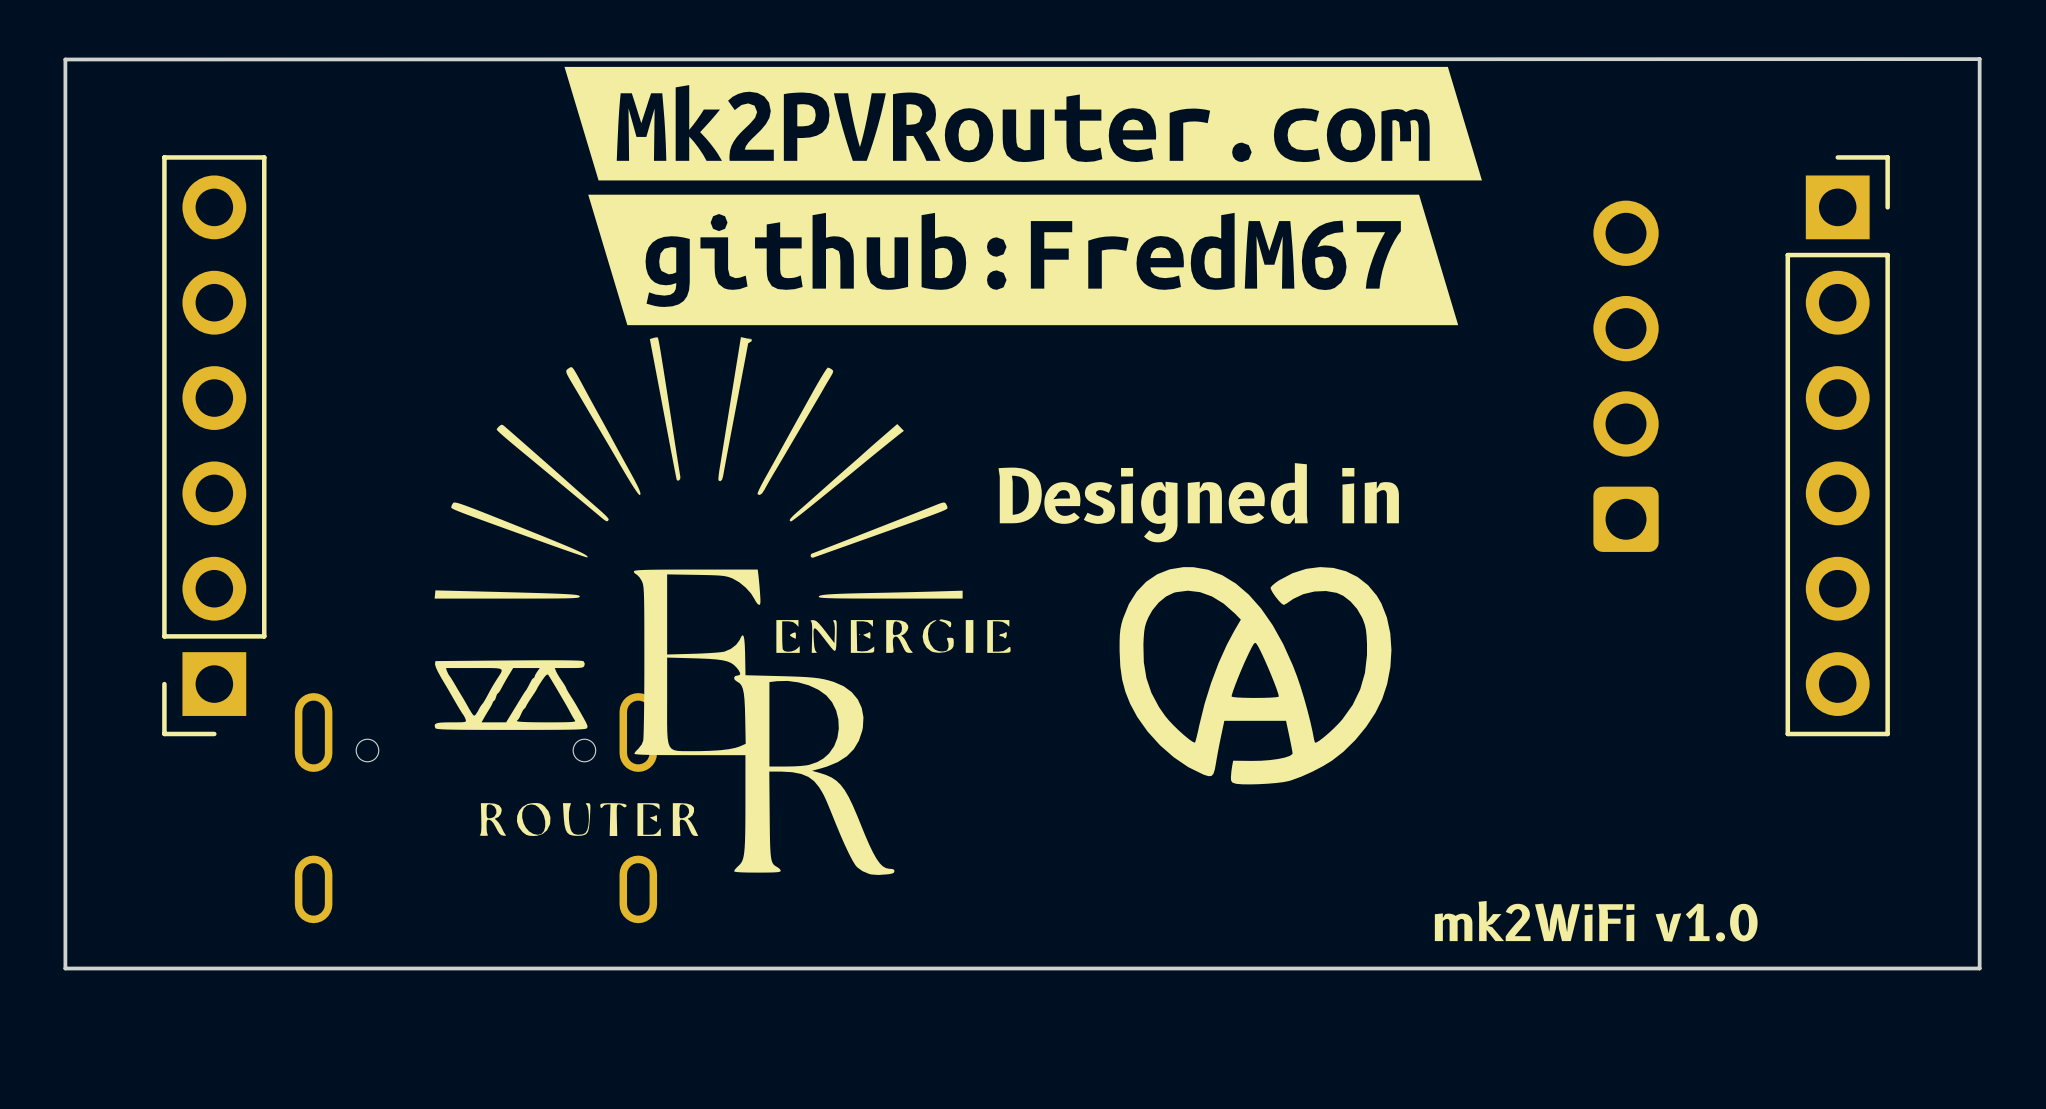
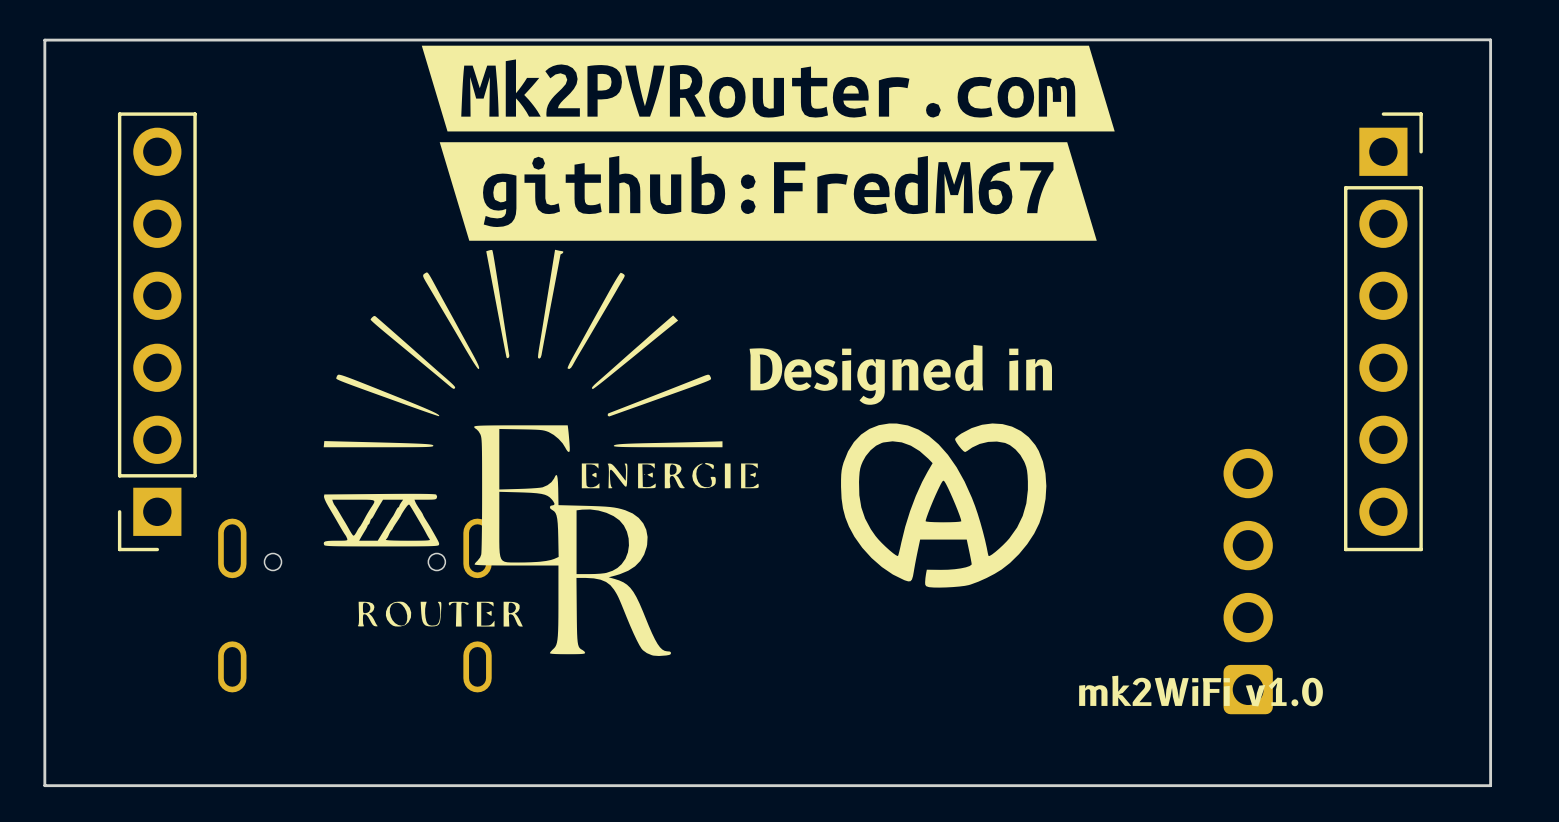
part position: (1626, 376) -> (1248, 581)
board edge: (1979, 968) (65, 968) -> (1490, 726) (1490, 785) (44, 785) (44, 726)

